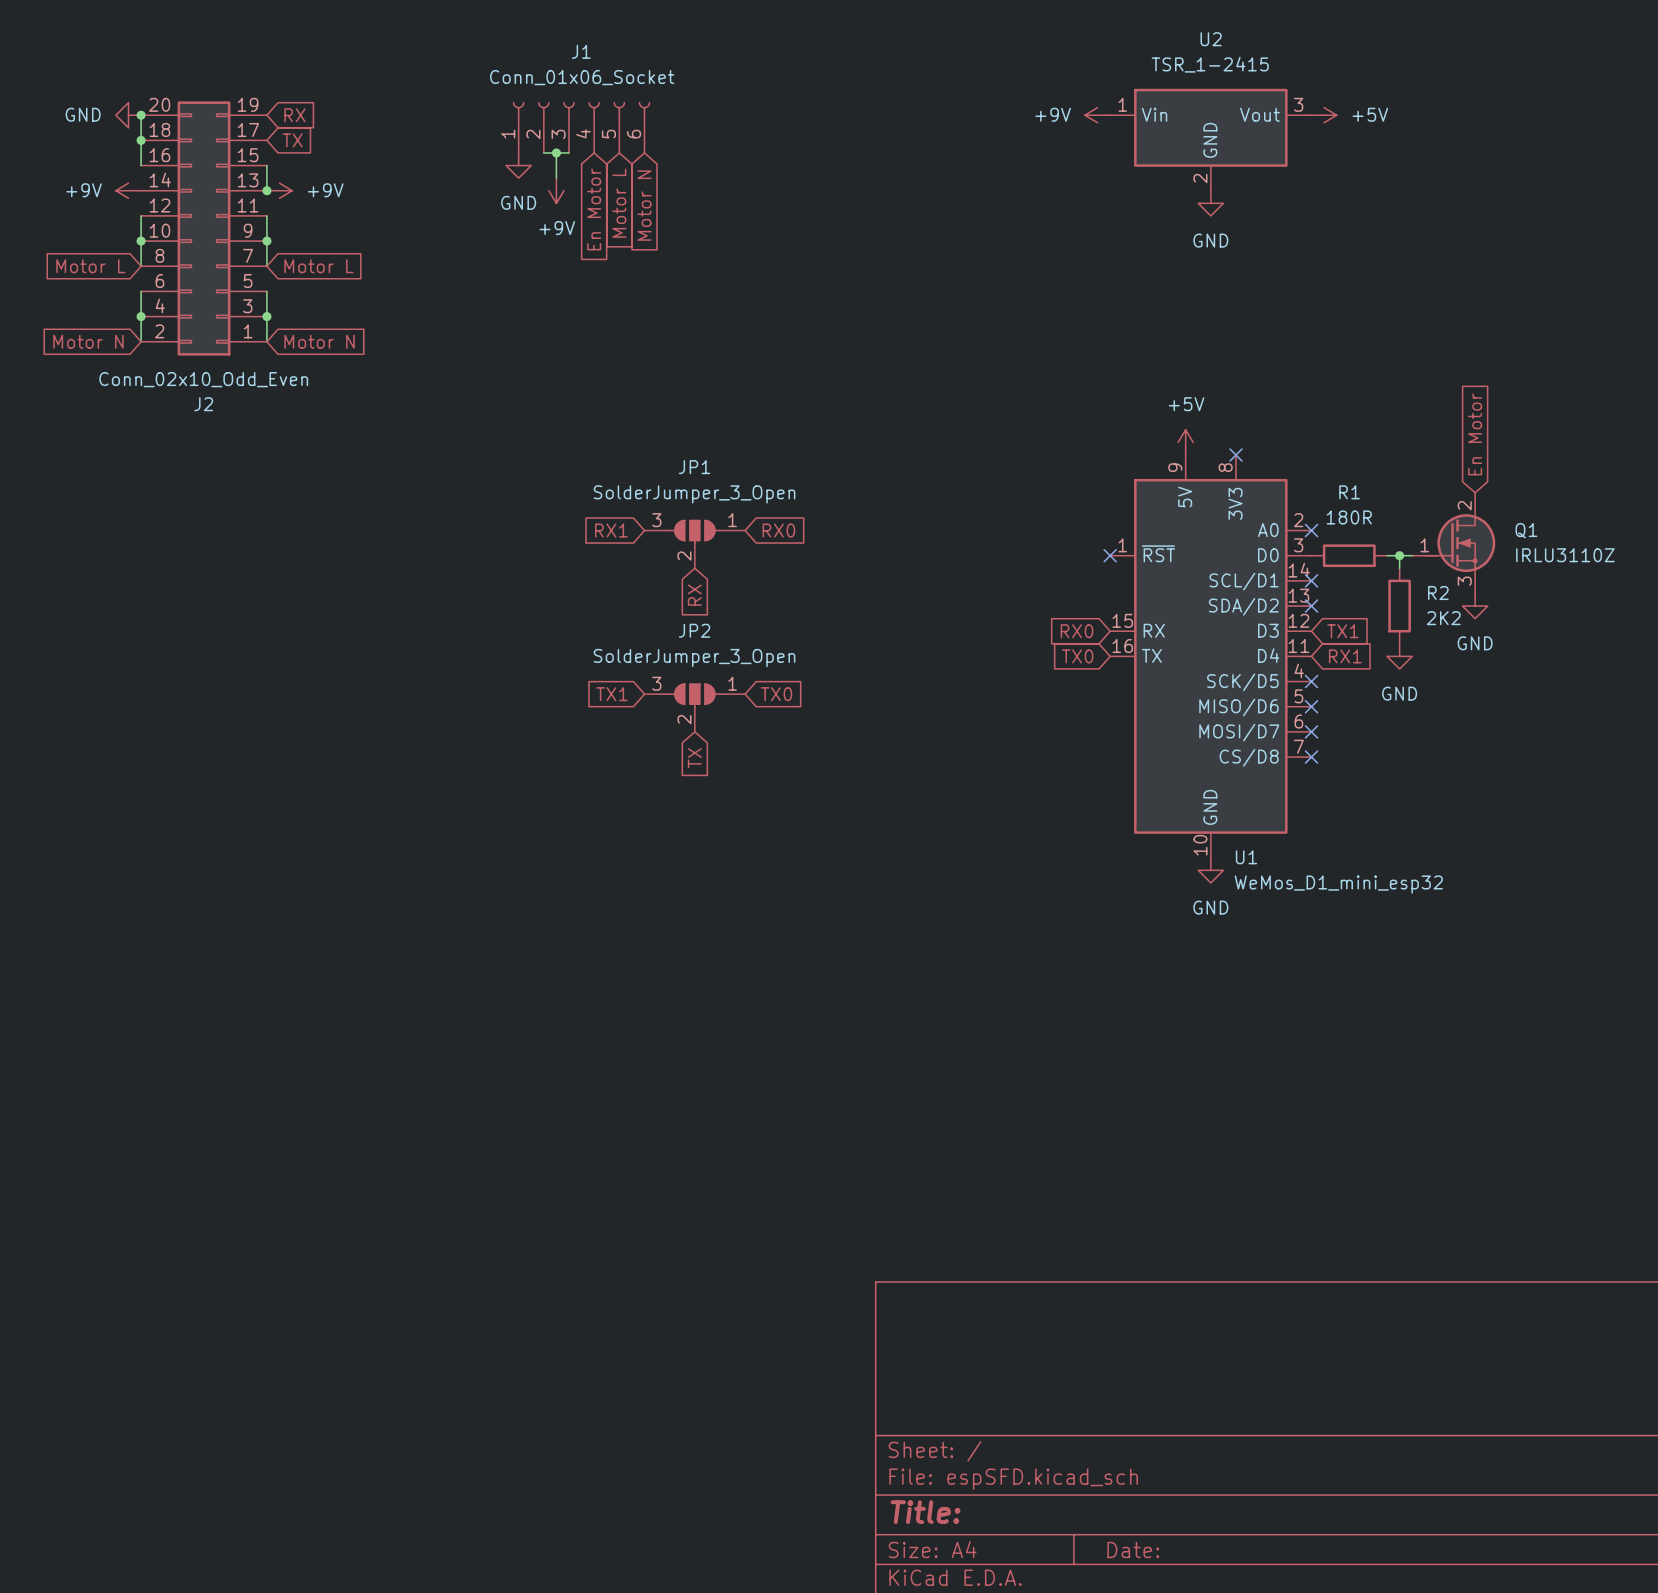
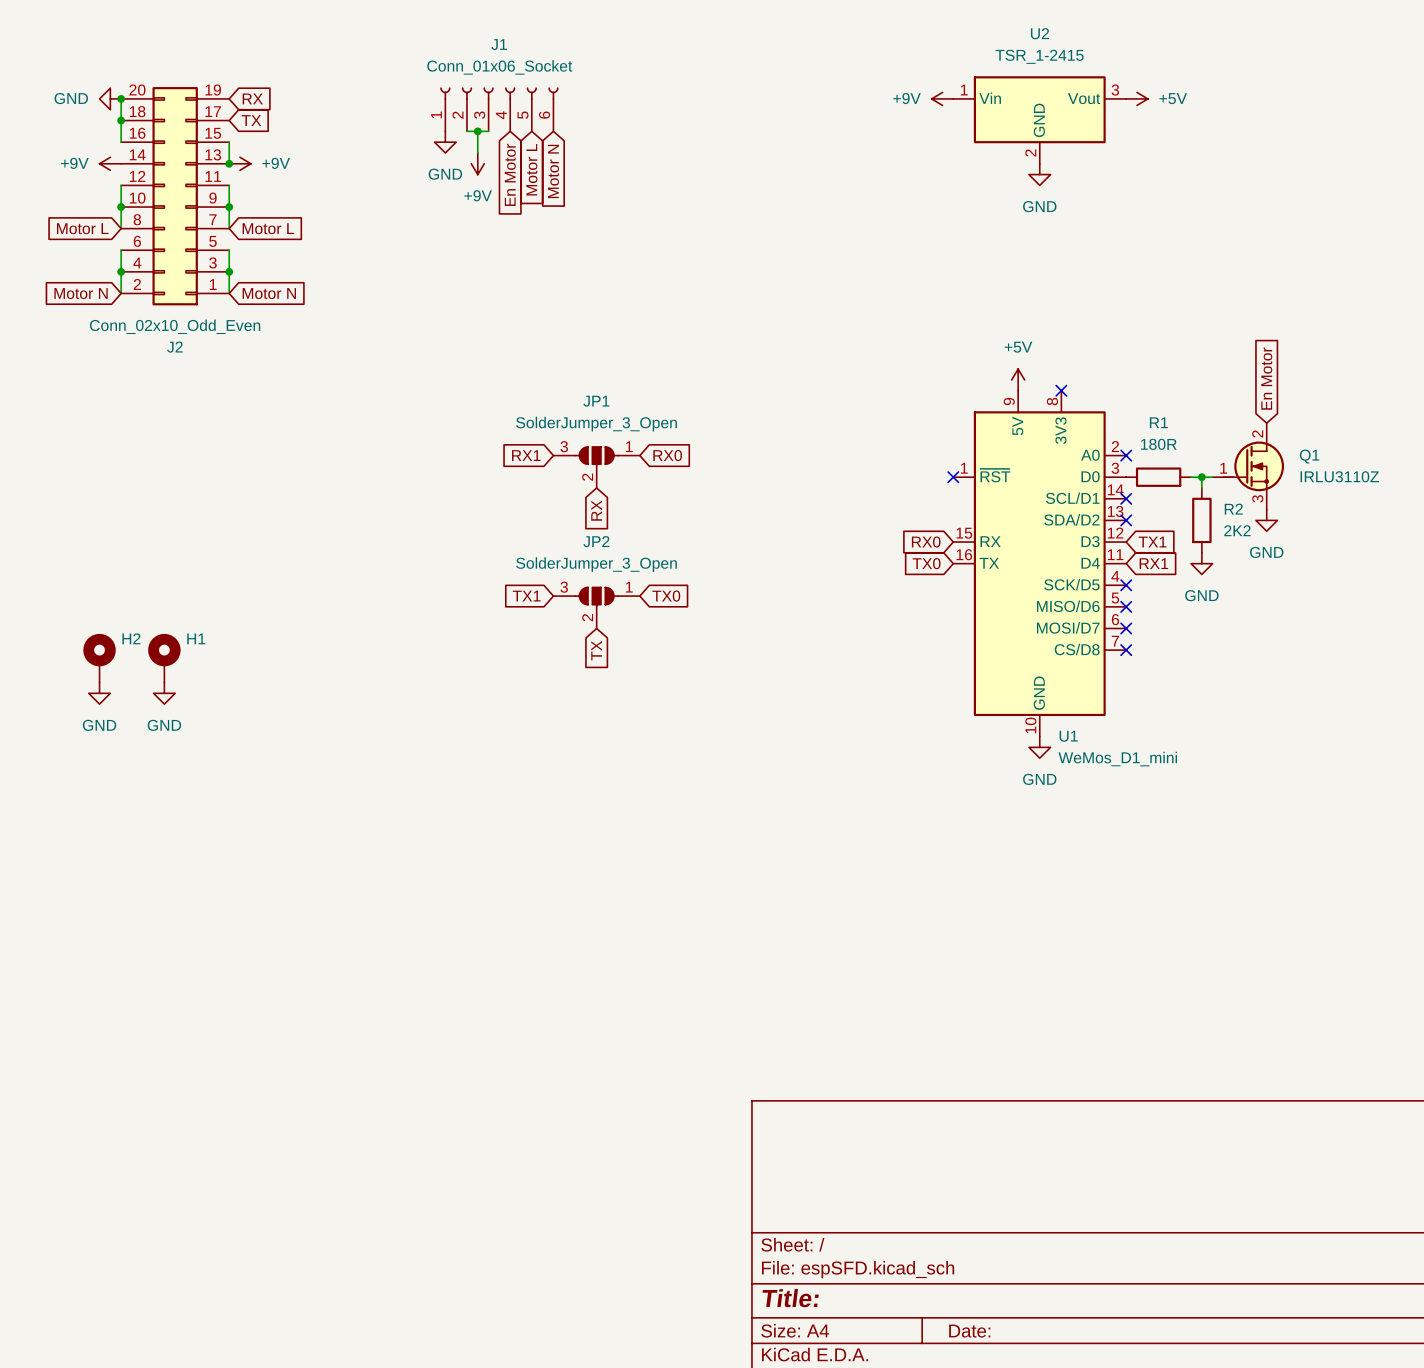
H2: none -> (99, 658)
H1: none -> (164, 658)
power symbol: none -> GND (99, 693)
power symbol: none -> GND (164, 693)
U1 value: WeMos_D1_mini_esp32 (1338, 884) -> WeMos_D1_mini (1117, 759)

